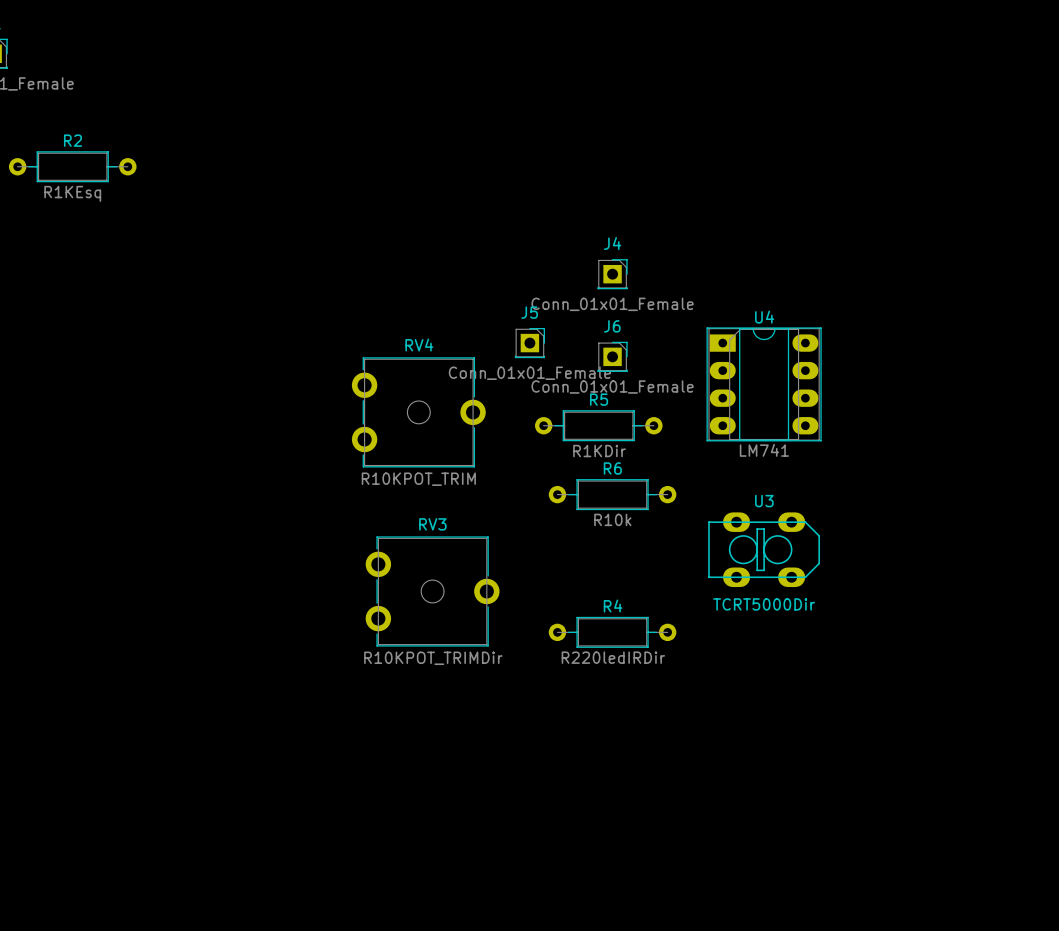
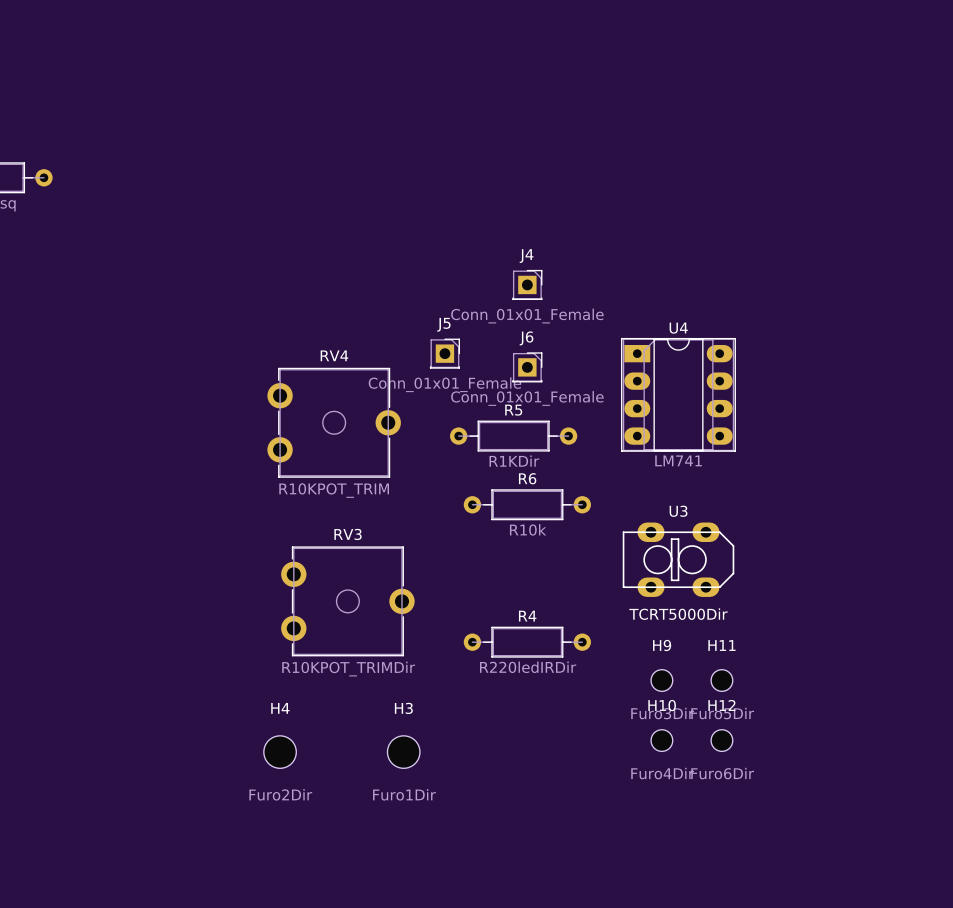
H9: none -> Furo3Dir (661, 680)
H11: none -> Furo5Dir (721, 680)
H10: none -> Furo4Dir (661, 740)
H12: none -> Furo6Dir (721, 740)
H4: none -> Furo2Dir (280, 752)
H3: none -> Furo1Dir (403, 752)

